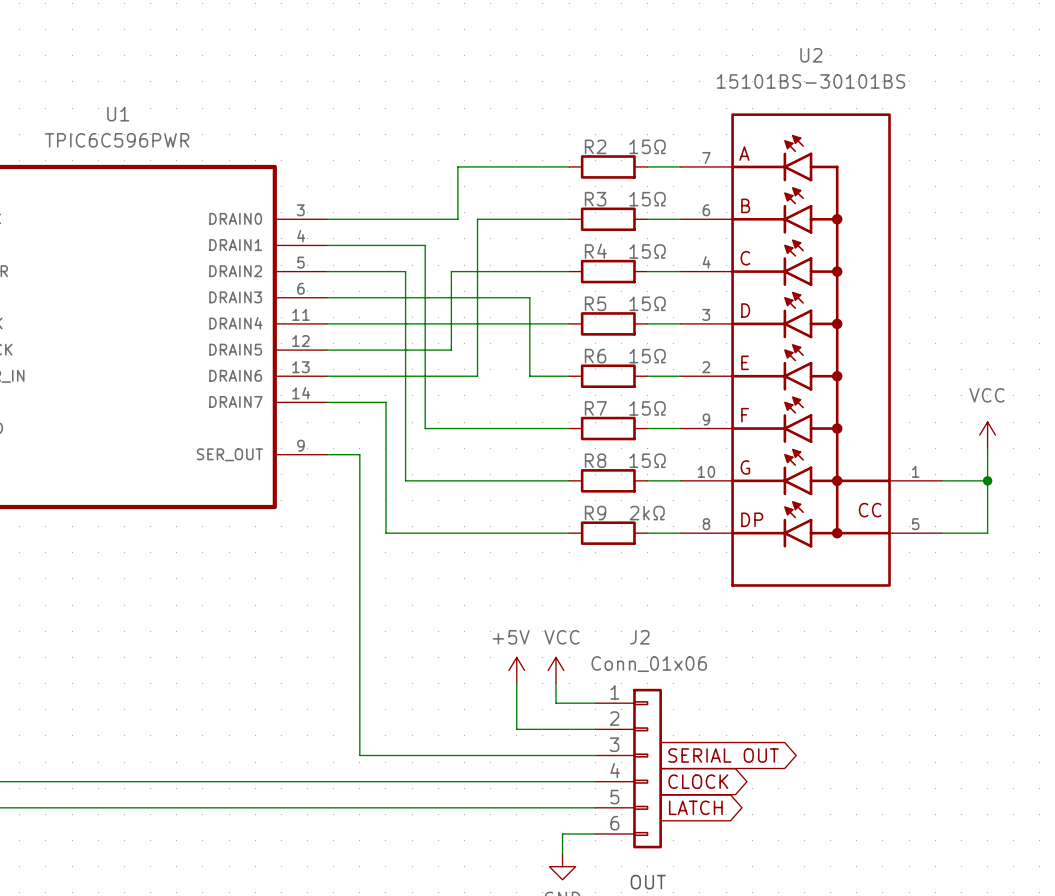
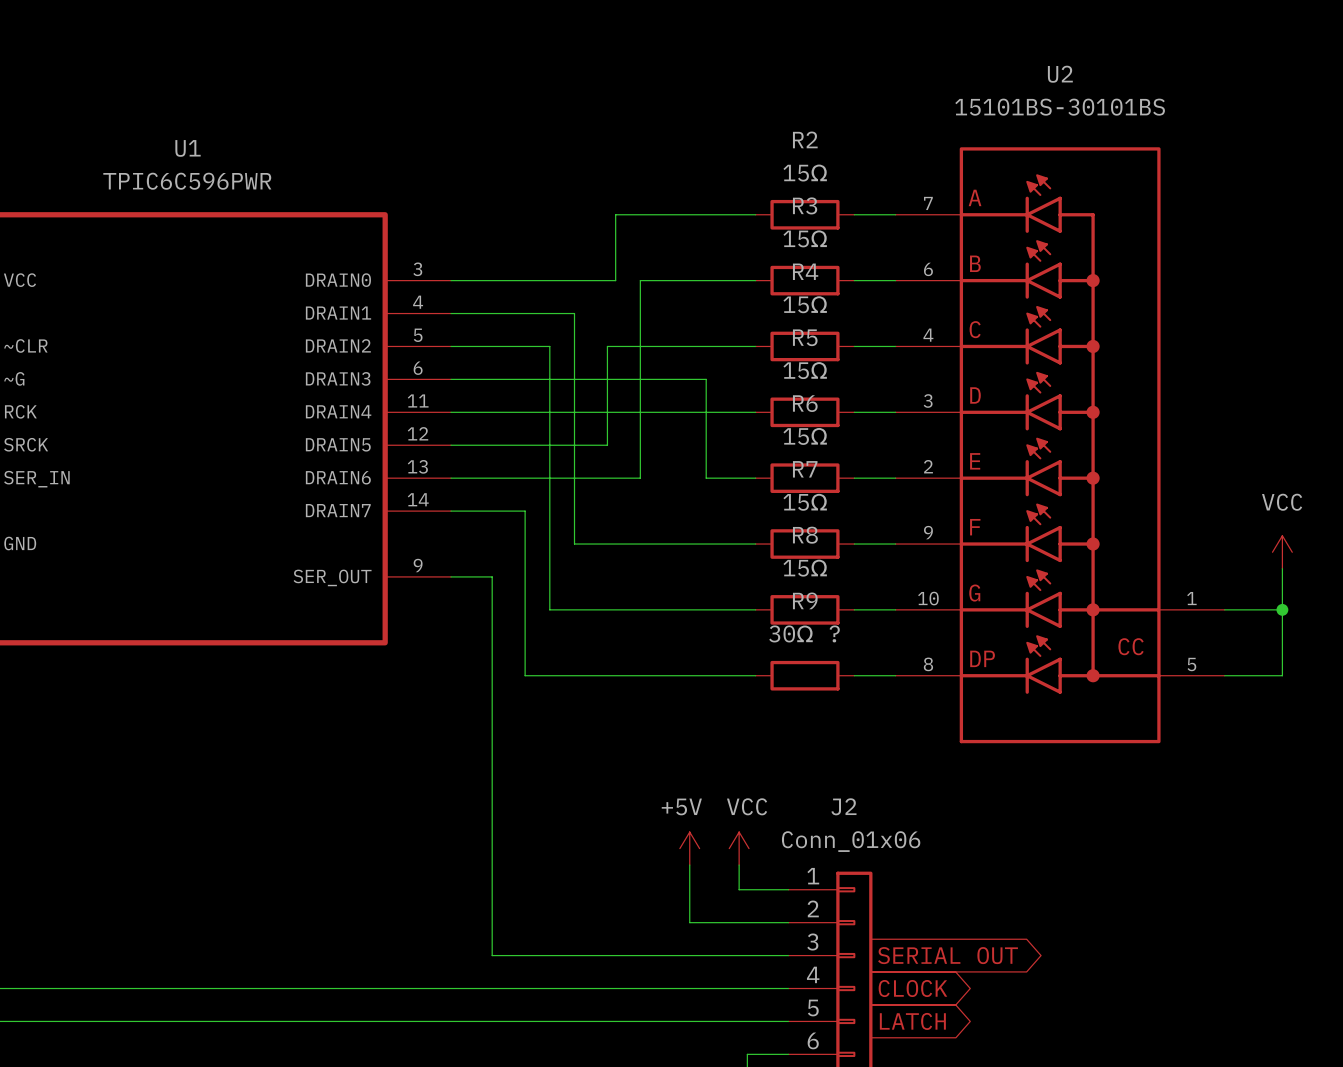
R2 name position: R2 (595, 146) -> R2 (805, 139)
R2 value position: 15Ω (647, 146) -> 15Ω (805, 173)
R3 name position: R3 (595, 199) -> R3 (805, 205)
R3 value position: 15Ω (647, 199) -> 15Ω (805, 238)
R4 name position: R4 (595, 251) -> R4 (805, 271)
R4 value position: 15Ω (647, 251) -> 15Ω (805, 304)
R5 name position: R5 (595, 303) -> R5 (805, 337)
R5 value position: 15Ω (647, 303) -> 15Ω (805, 370)
R6 name position: R6 (595, 356) -> R6 (805, 403)
R6 value position: 15Ω (647, 356) -> 15Ω (805, 436)
R7 name position: R7 (595, 408) -> R7 (805, 469)
R7 value position: 15Ω (647, 408) -> 15Ω (805, 502)
R8 name position: R8 (595, 460) -> R8 (805, 535)
R8 value position: 15Ω (647, 460) -> 15Ω (805, 568)
R9 name position: R9 (595, 513) -> R9 (805, 600)
R9 value: 2kΩ (647, 513) -> 30Ω ? (804, 633)

